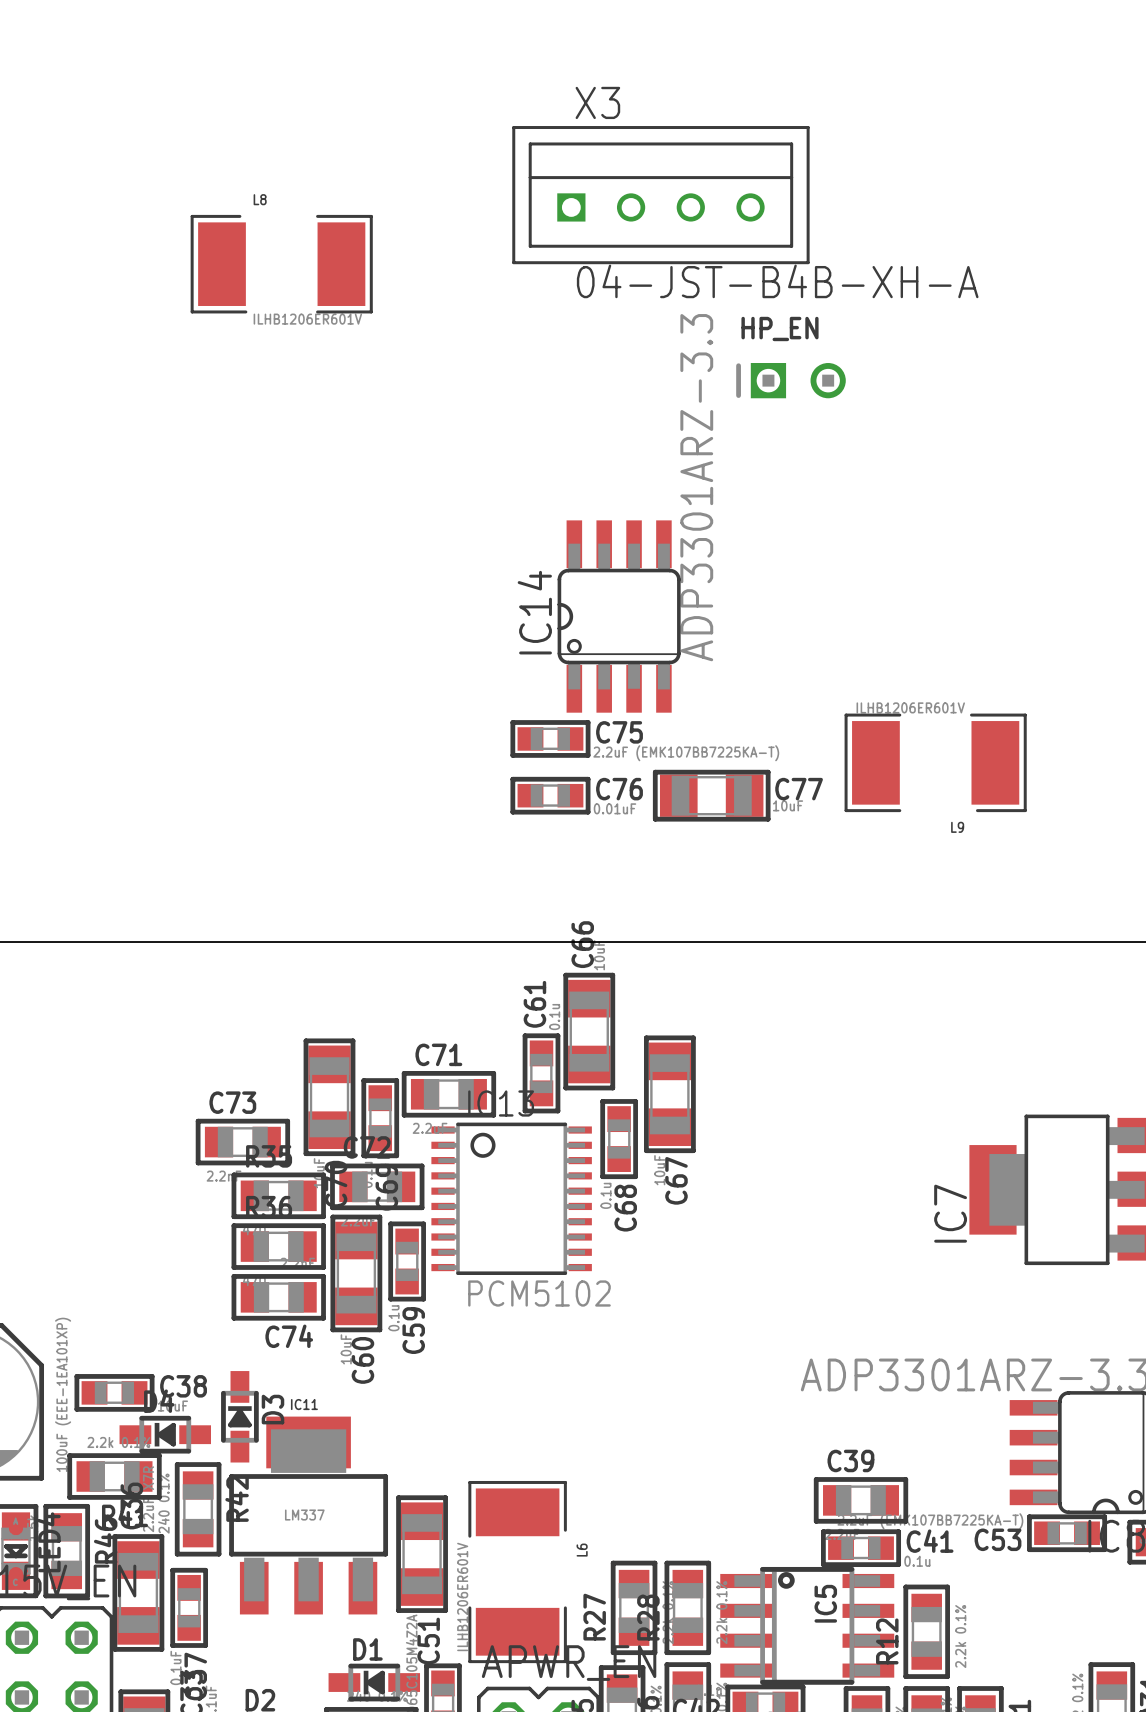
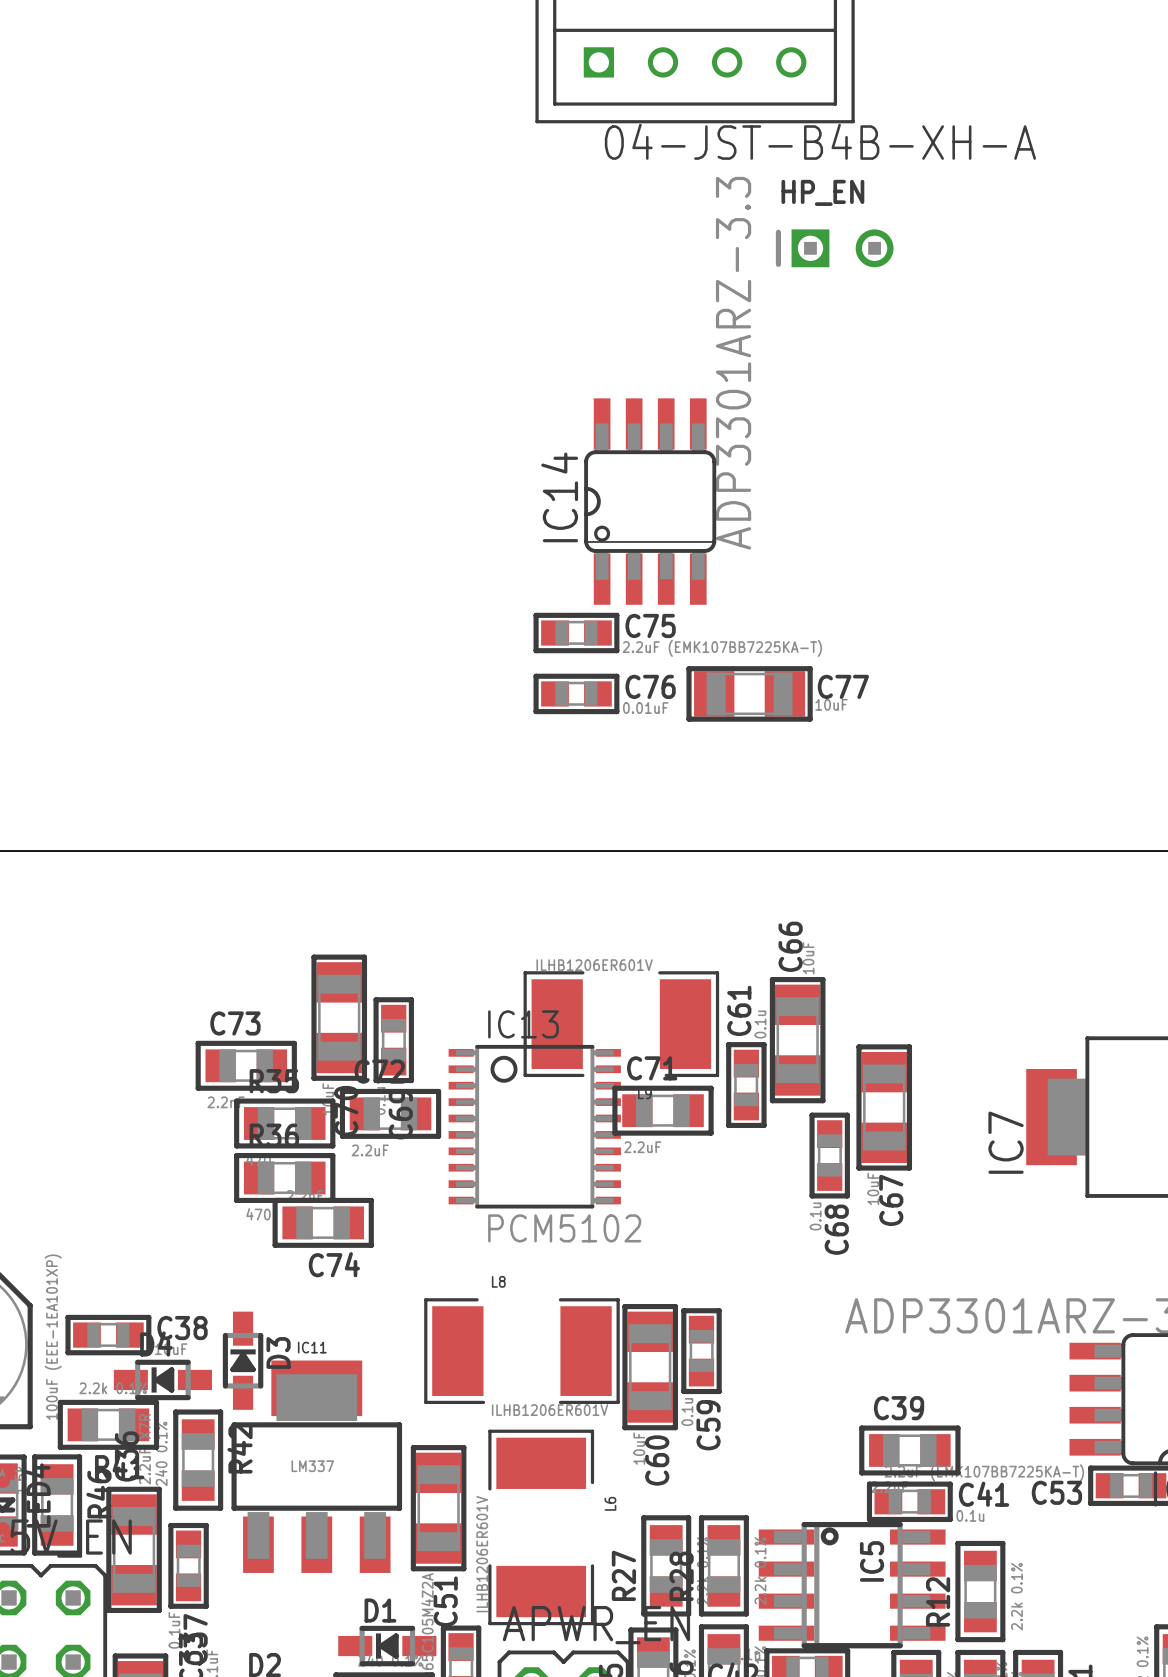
L8 position: (281, 264) -> (521, 1351)
L9 position: (935, 762) -> (621, 1024)
C66 position: (589, 1031) -> (797, 1040)
C61 position: (541, 1073) -> (746, 1085)
C71 position: (448, 1094) -> (663, 1110)
C67 position: (669, 1094) -> (884, 1107)
C68 position: (619, 1139) -> (829, 1155)
C59 position: (407, 1261) -> (701, 1351)
C60 position: (356, 1273) -> (650, 1367)
C74 position: (278, 1297) -> (323, 1222)

